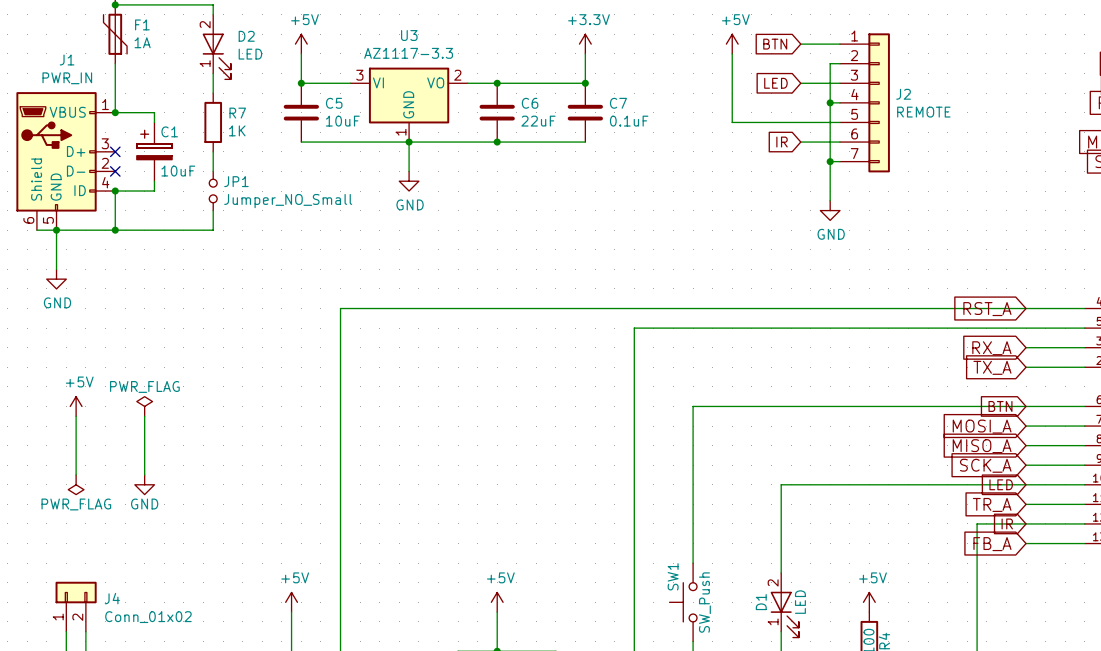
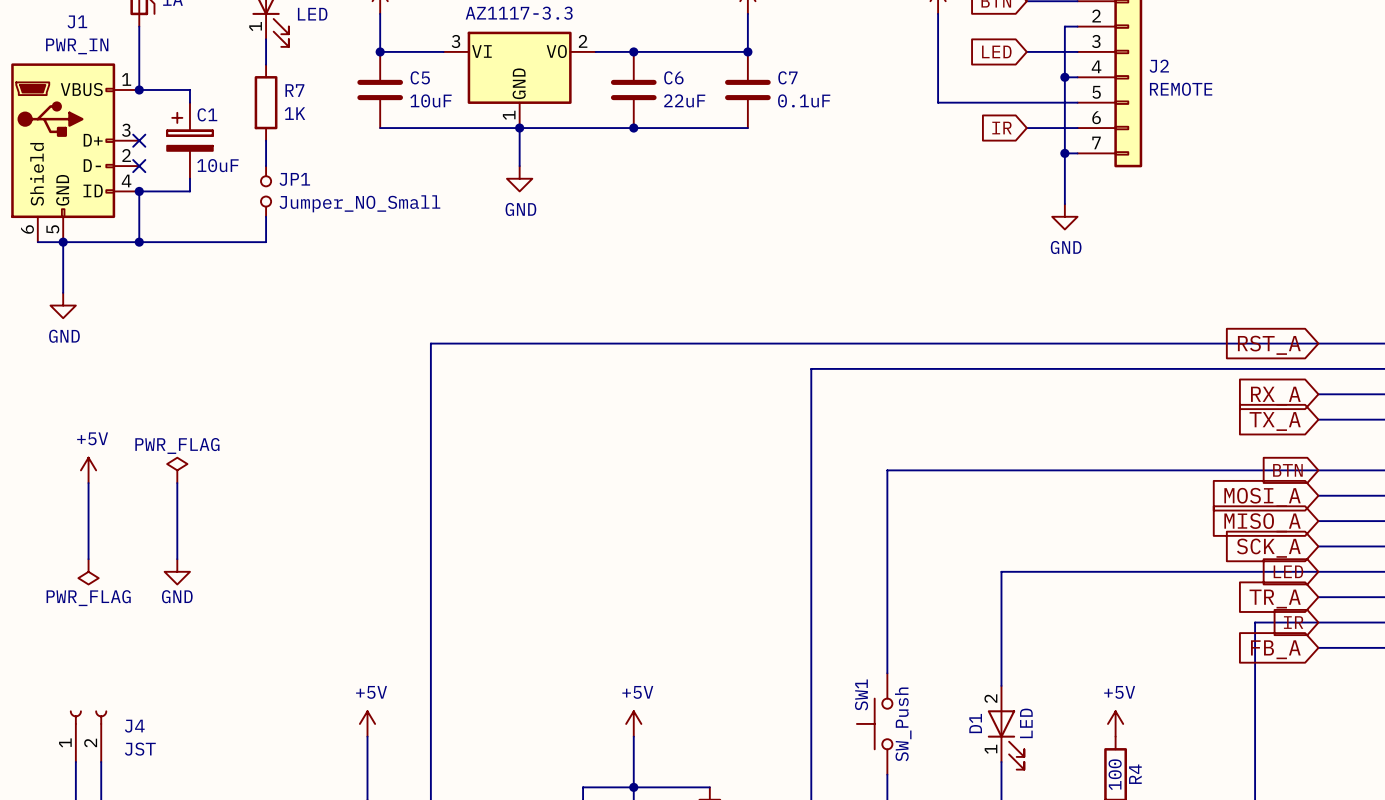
J4 symbol: [55, 581, 97, 632] -> [70, 710, 108, 763]
J4 value: Conn_01x02 (148, 617) -> JST (140, 749)

